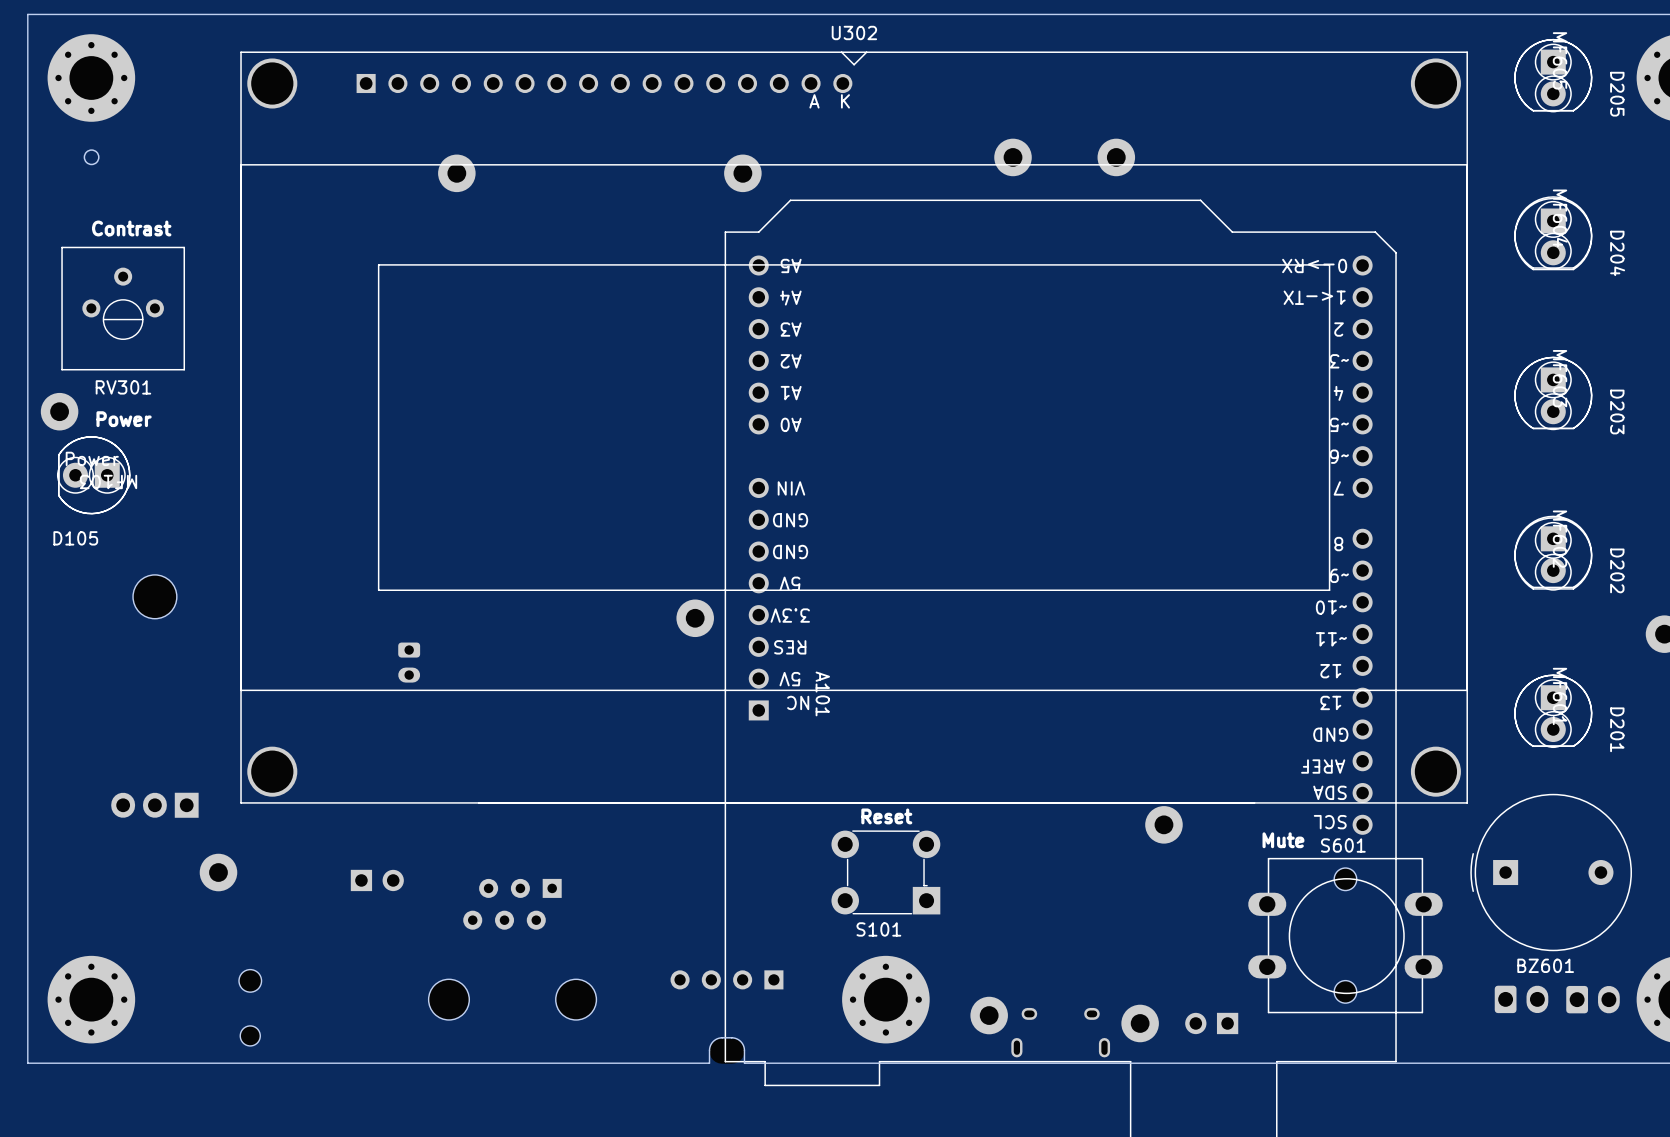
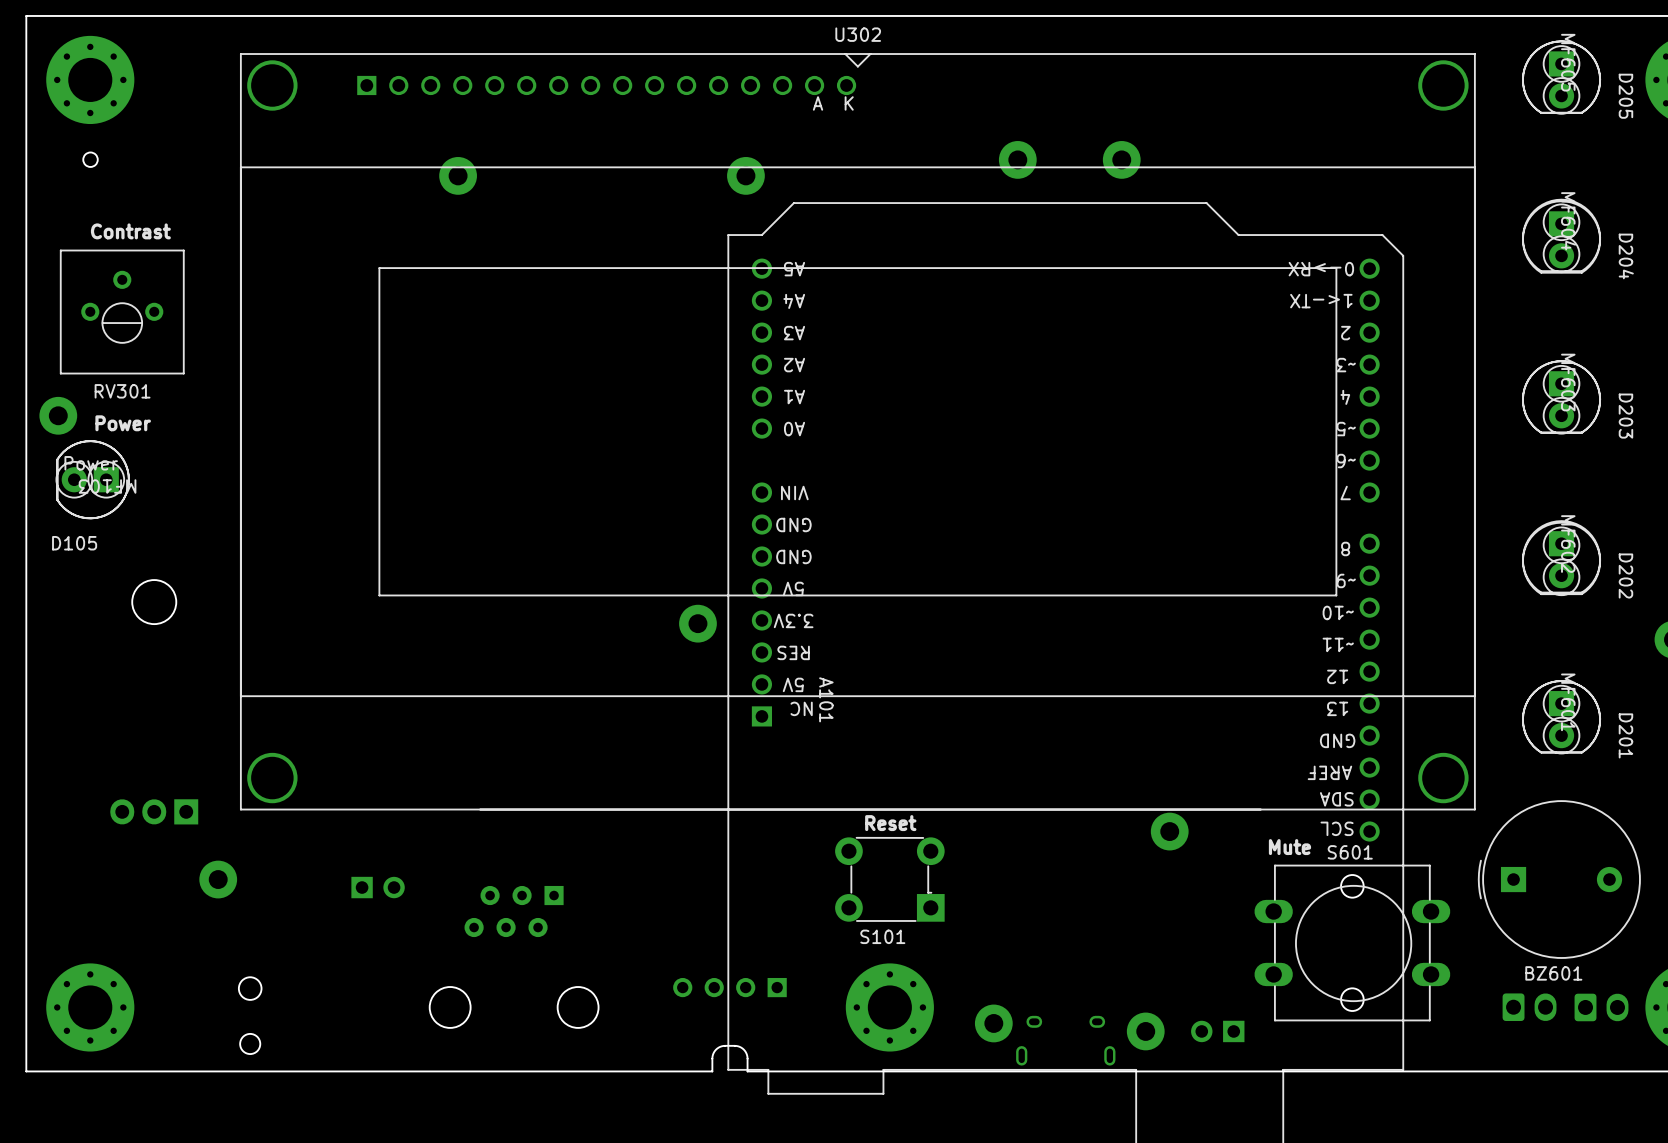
part: (409, 662) -> none

